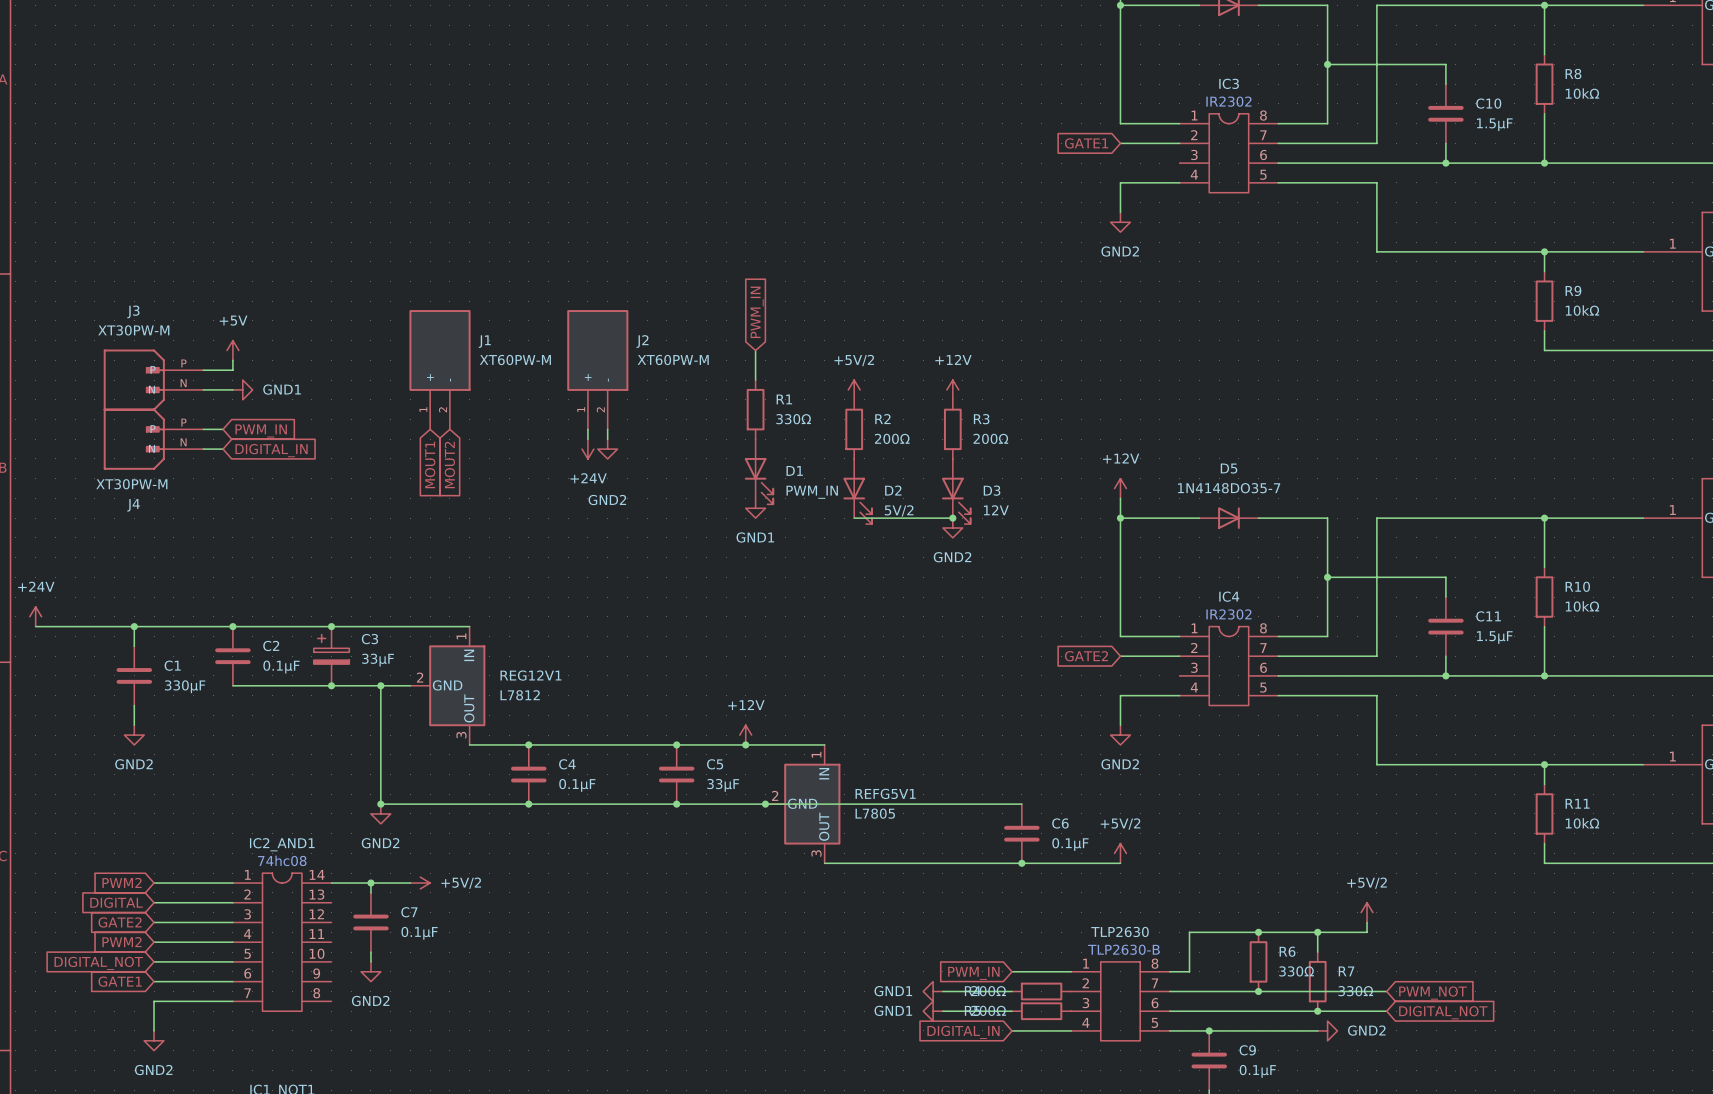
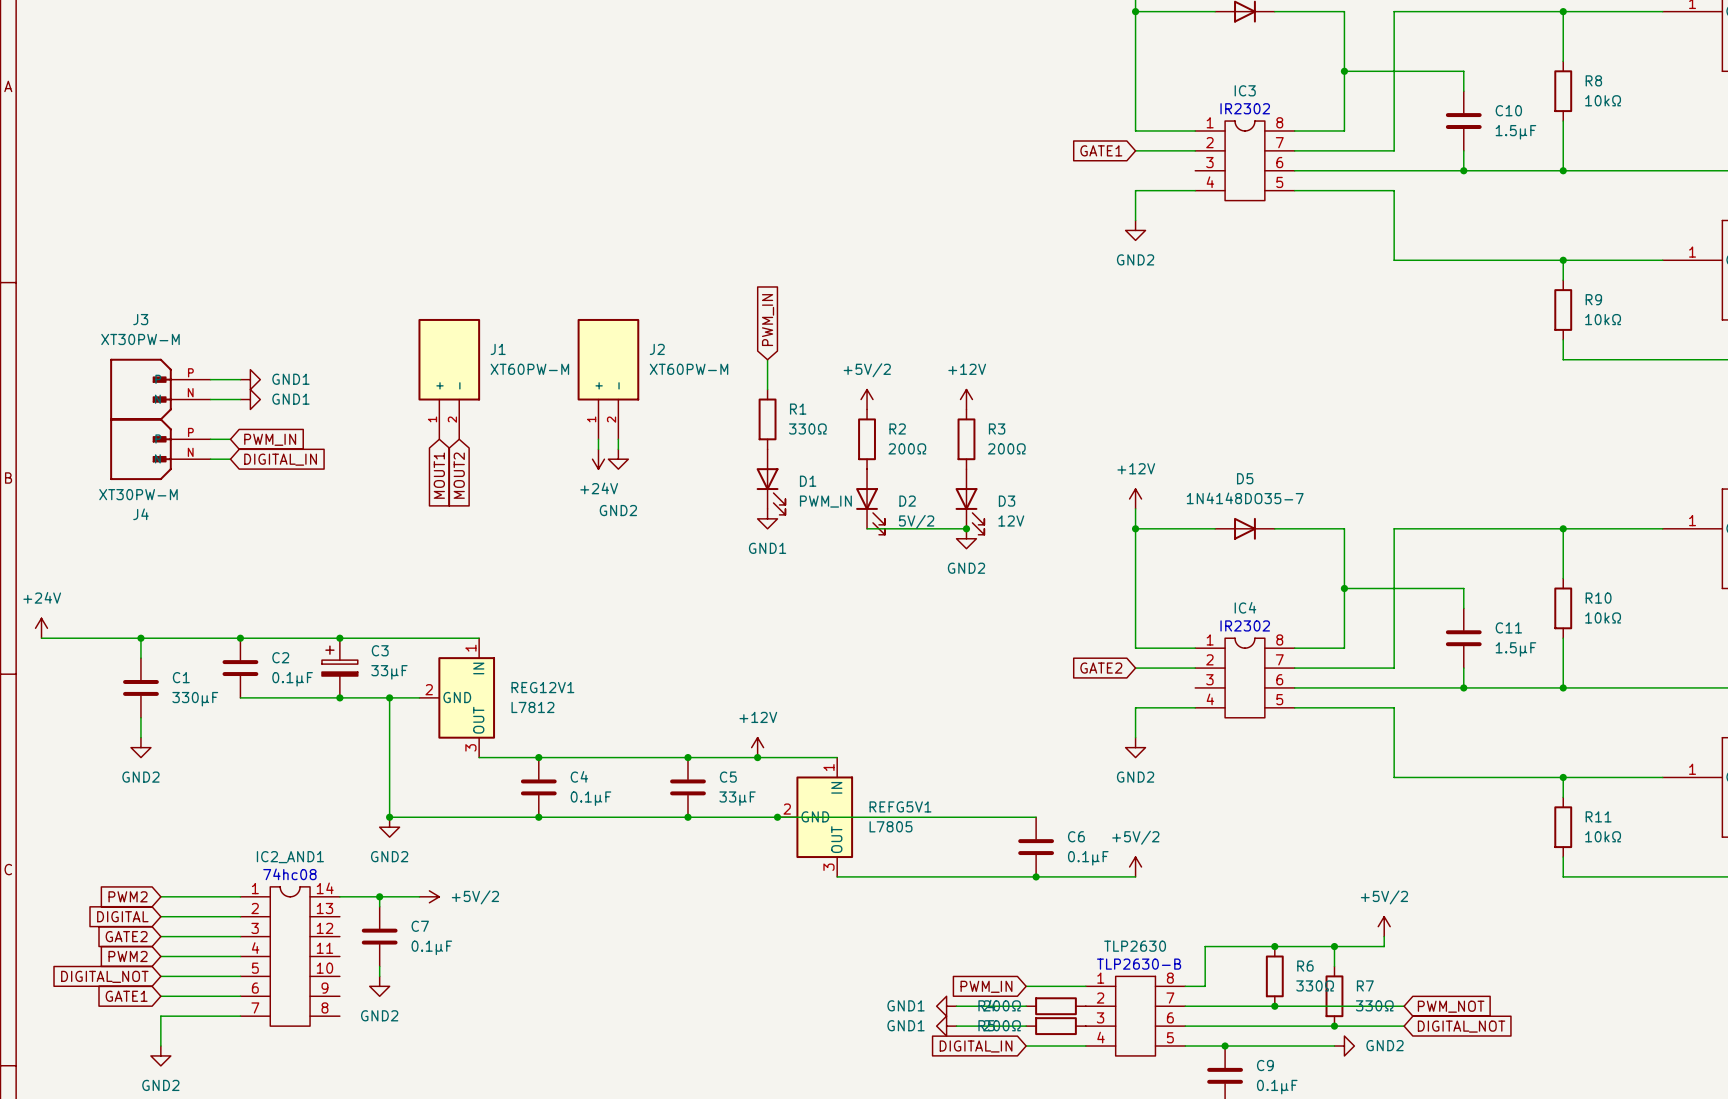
power symbol: +5V (232, 350) -> none
wire: (232, 360) (232, 370) -> none
power symbol: none -> GND1 (250, 379)

